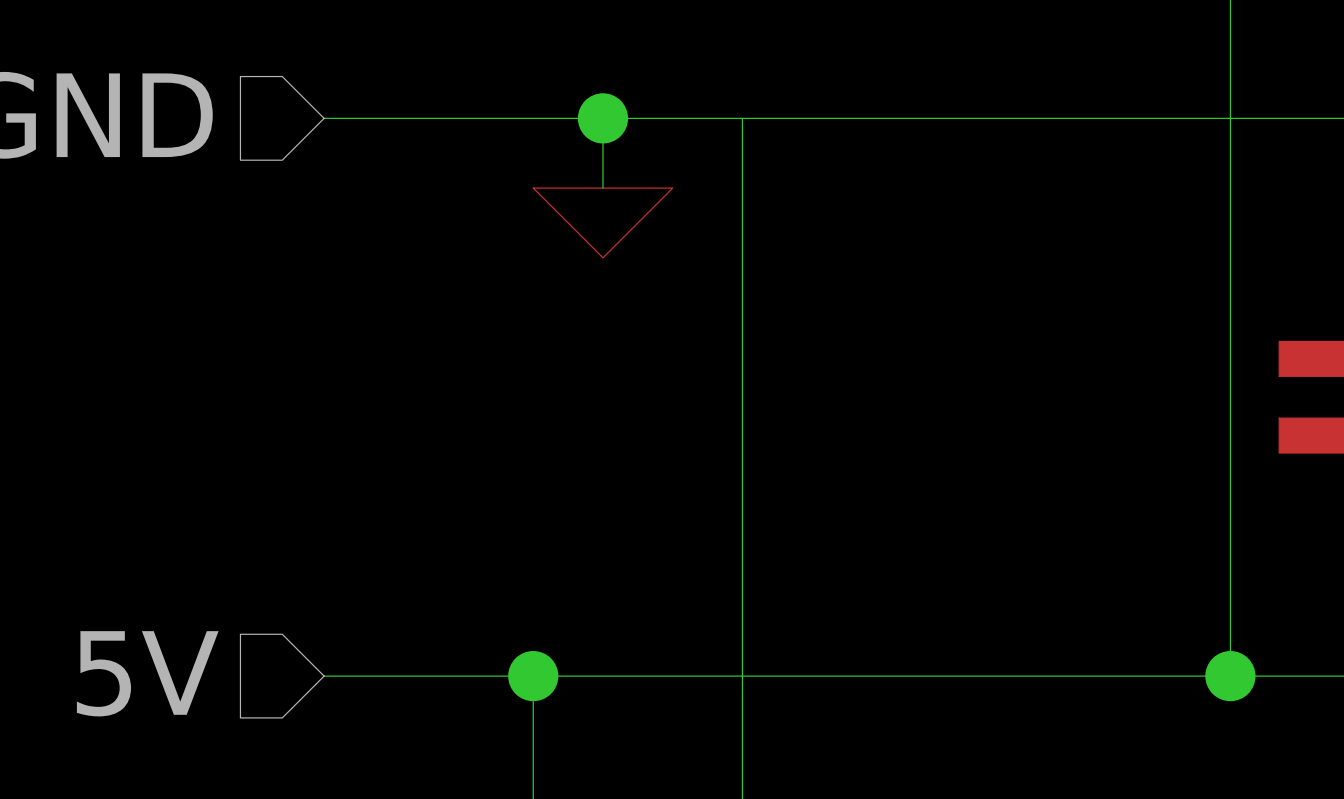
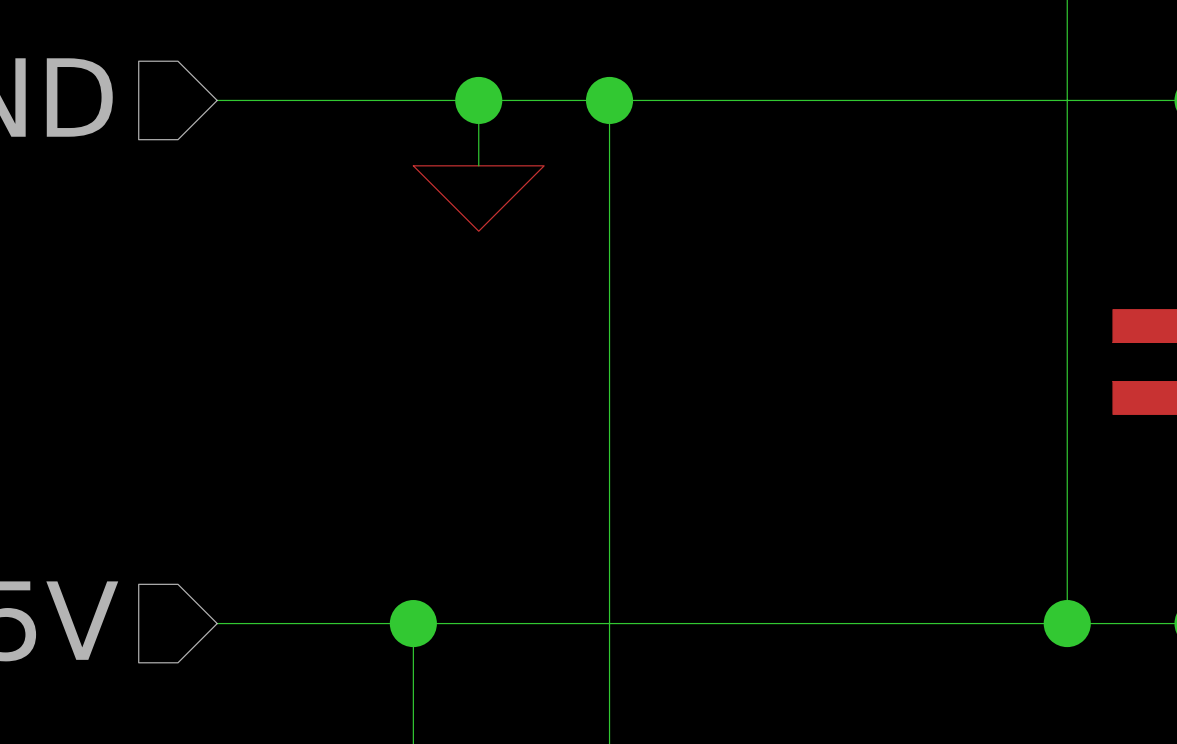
junction: none -> (609, 100)

